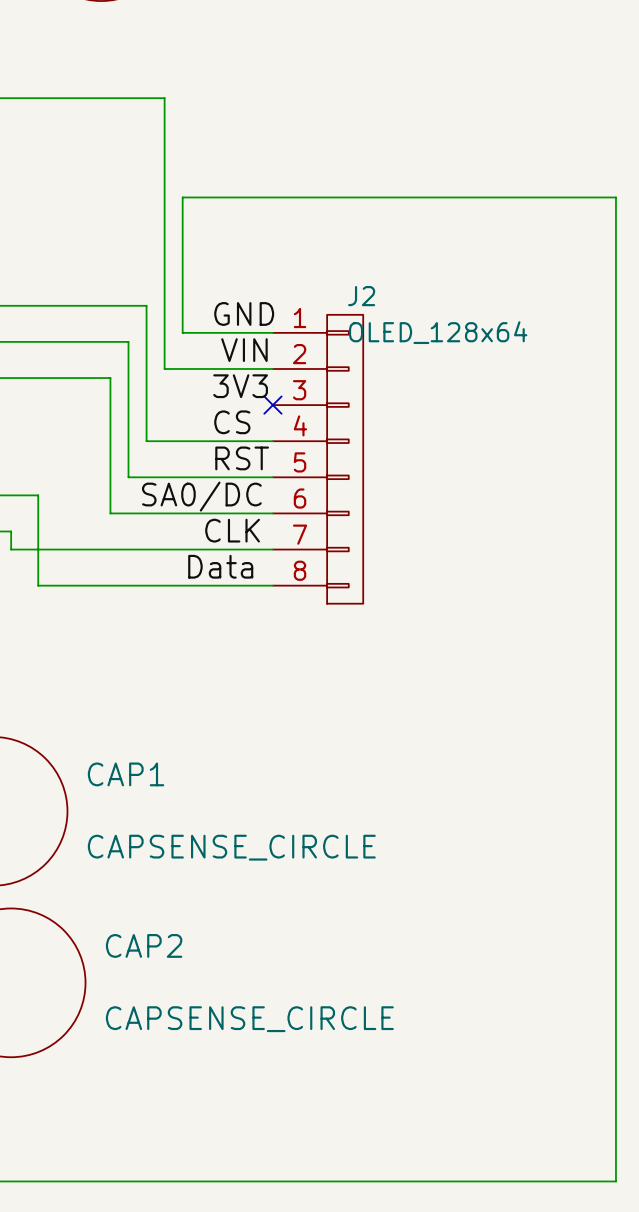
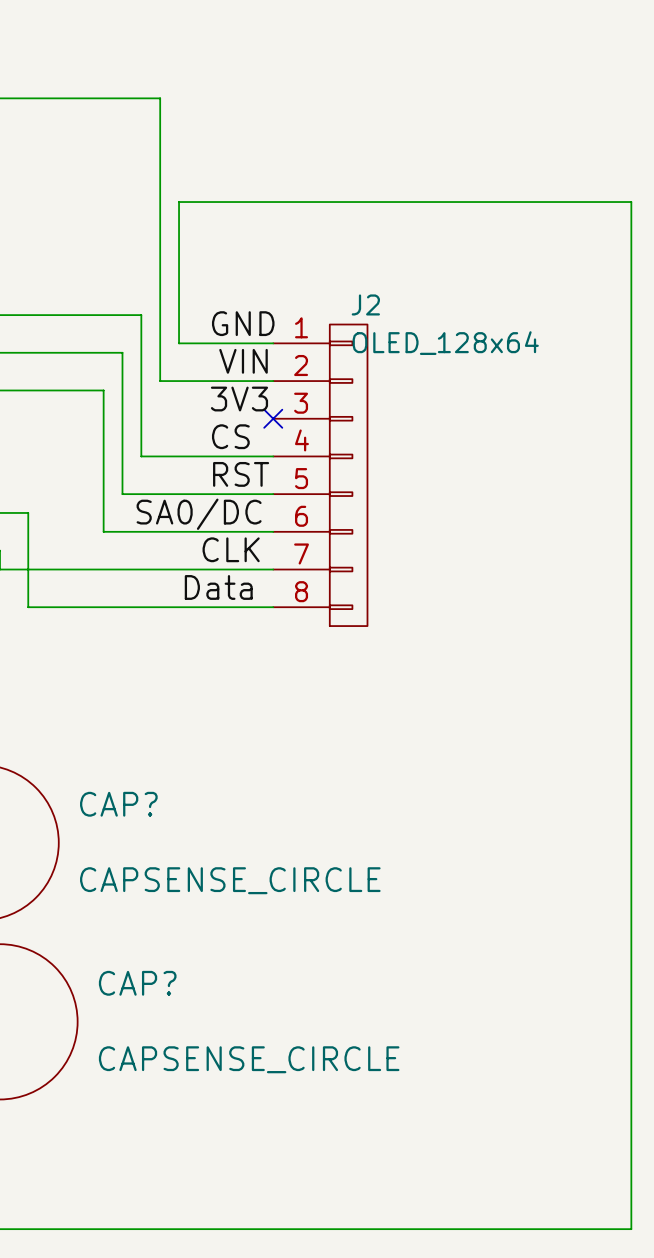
CAP1 name: CAP1 (126, 774) -> CAP? (118, 804)
CAP2 name: CAP2 (144, 945) -> CAP? (137, 983)

